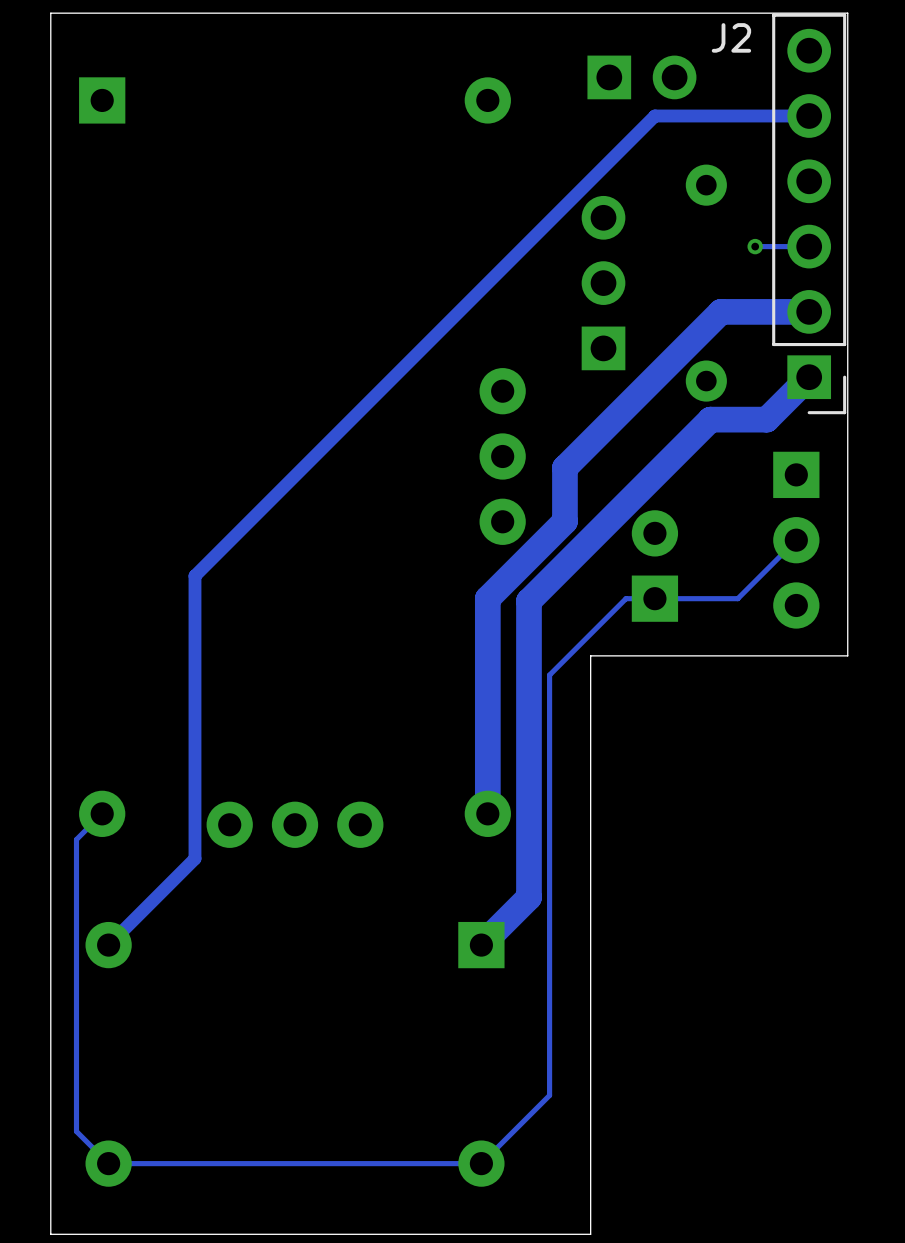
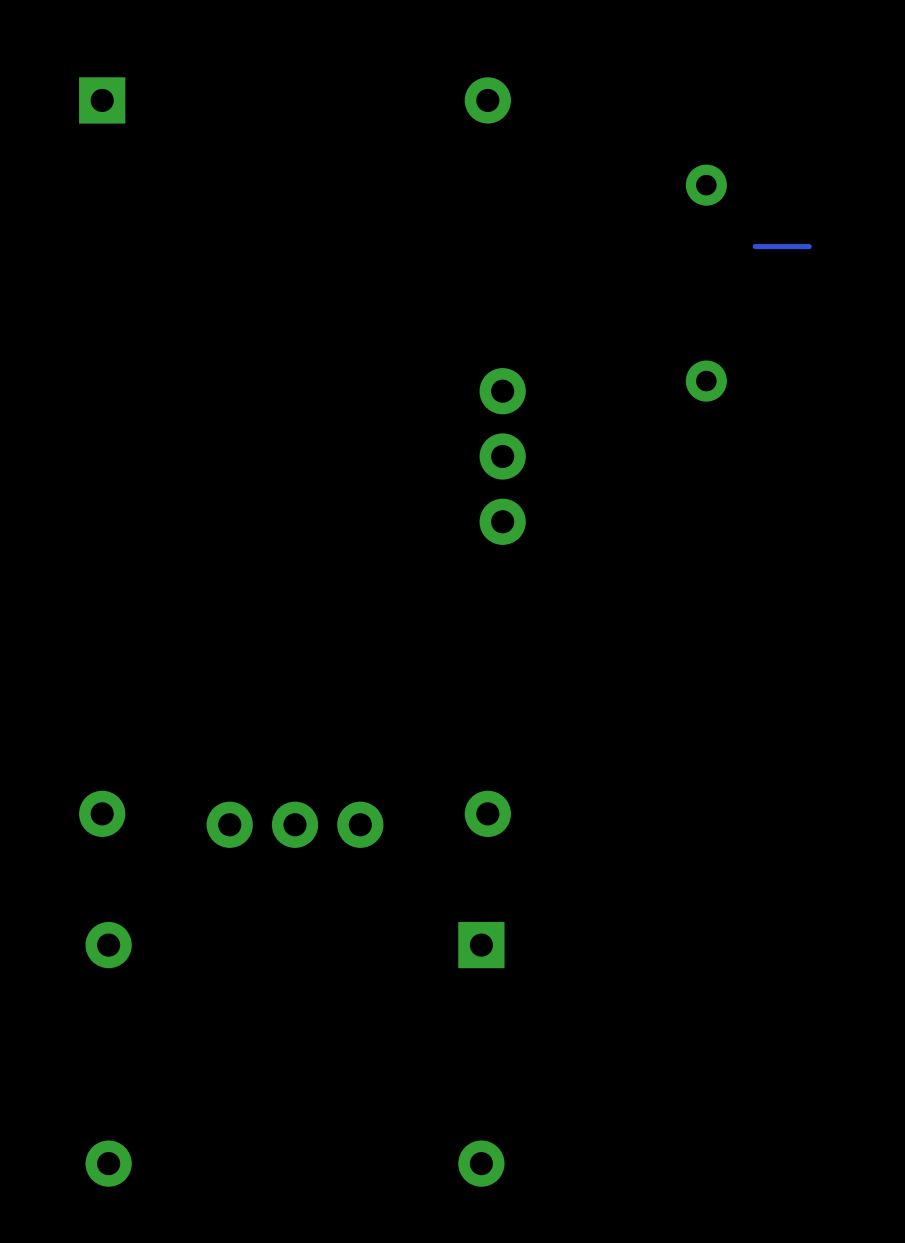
board edge: (847, 13) (50, 13) (50, 1234) (590, 1234) (590, 655) (847, 655) (847, 13) -> none
part: (641, 77) -> none
track: (809, 115) (654, 115) (194, 575) (194, 858) (108, 945) -> none
J2: (809, 213) -> none
via: (755, 246) -> none
part: (603, 283) -> none
track: (809, 318) (809, 311) (720, 311) (564, 467) (564, 521) (487, 598) (487, 813) -> none
track: (809, 377) (766, 419) (710, 419) (528, 601) (528, 897) (481, 945) -> none
track: (796, 540) (737, 598) (626, 598) (549, 675) (549, 1095) (481, 1163) (108, 1163) (76, 1131) (76, 839) (102, 813) -> none
part: (796, 540) -> none
part: (654, 566) -> none

